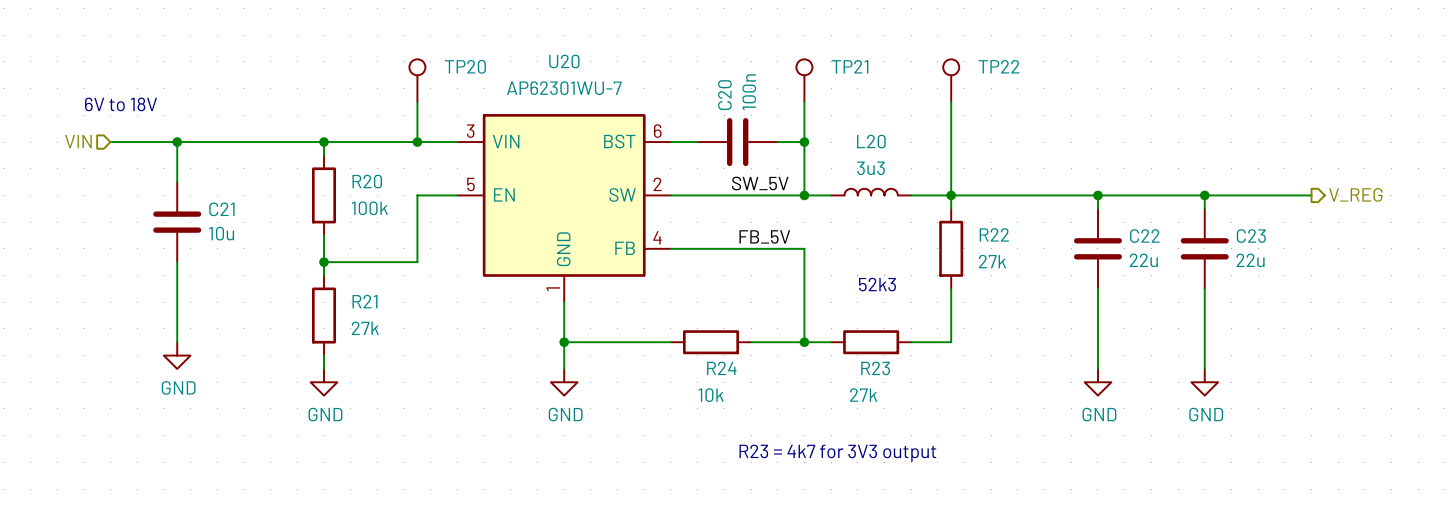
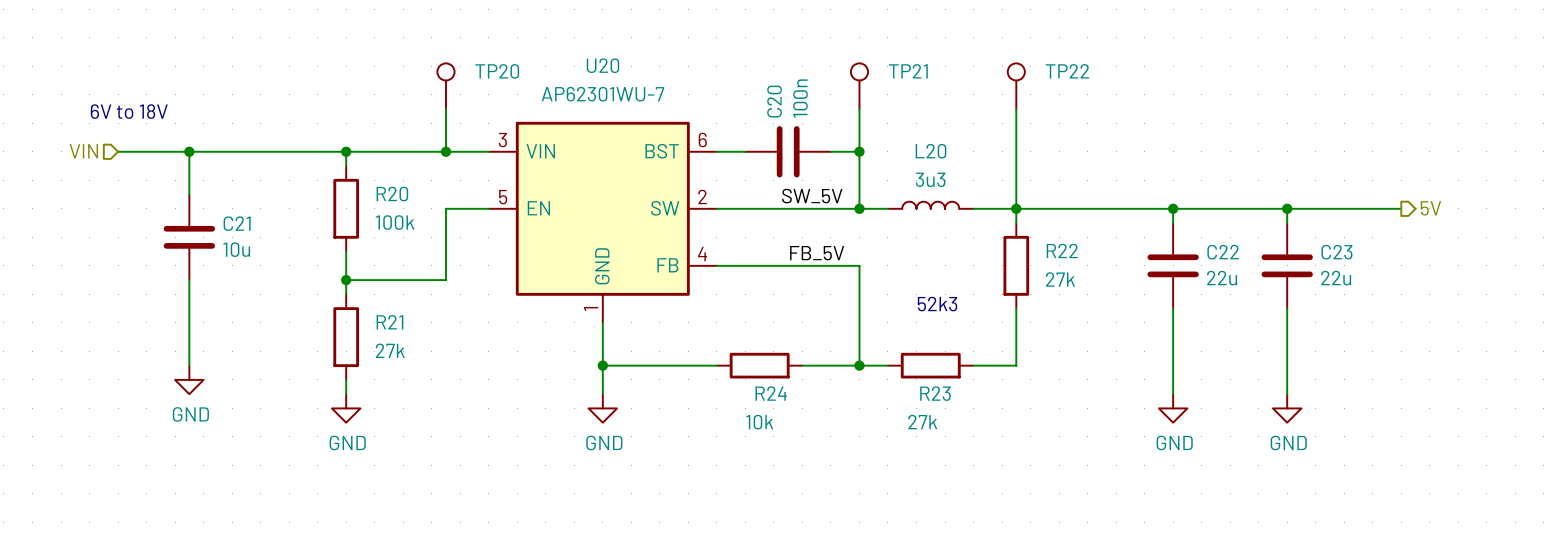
hierarchical label: V_REG (1355, 194) -> 5V (1430, 208)
text: R23 = 4k7 for 3V3 output (837, 453) -> none

